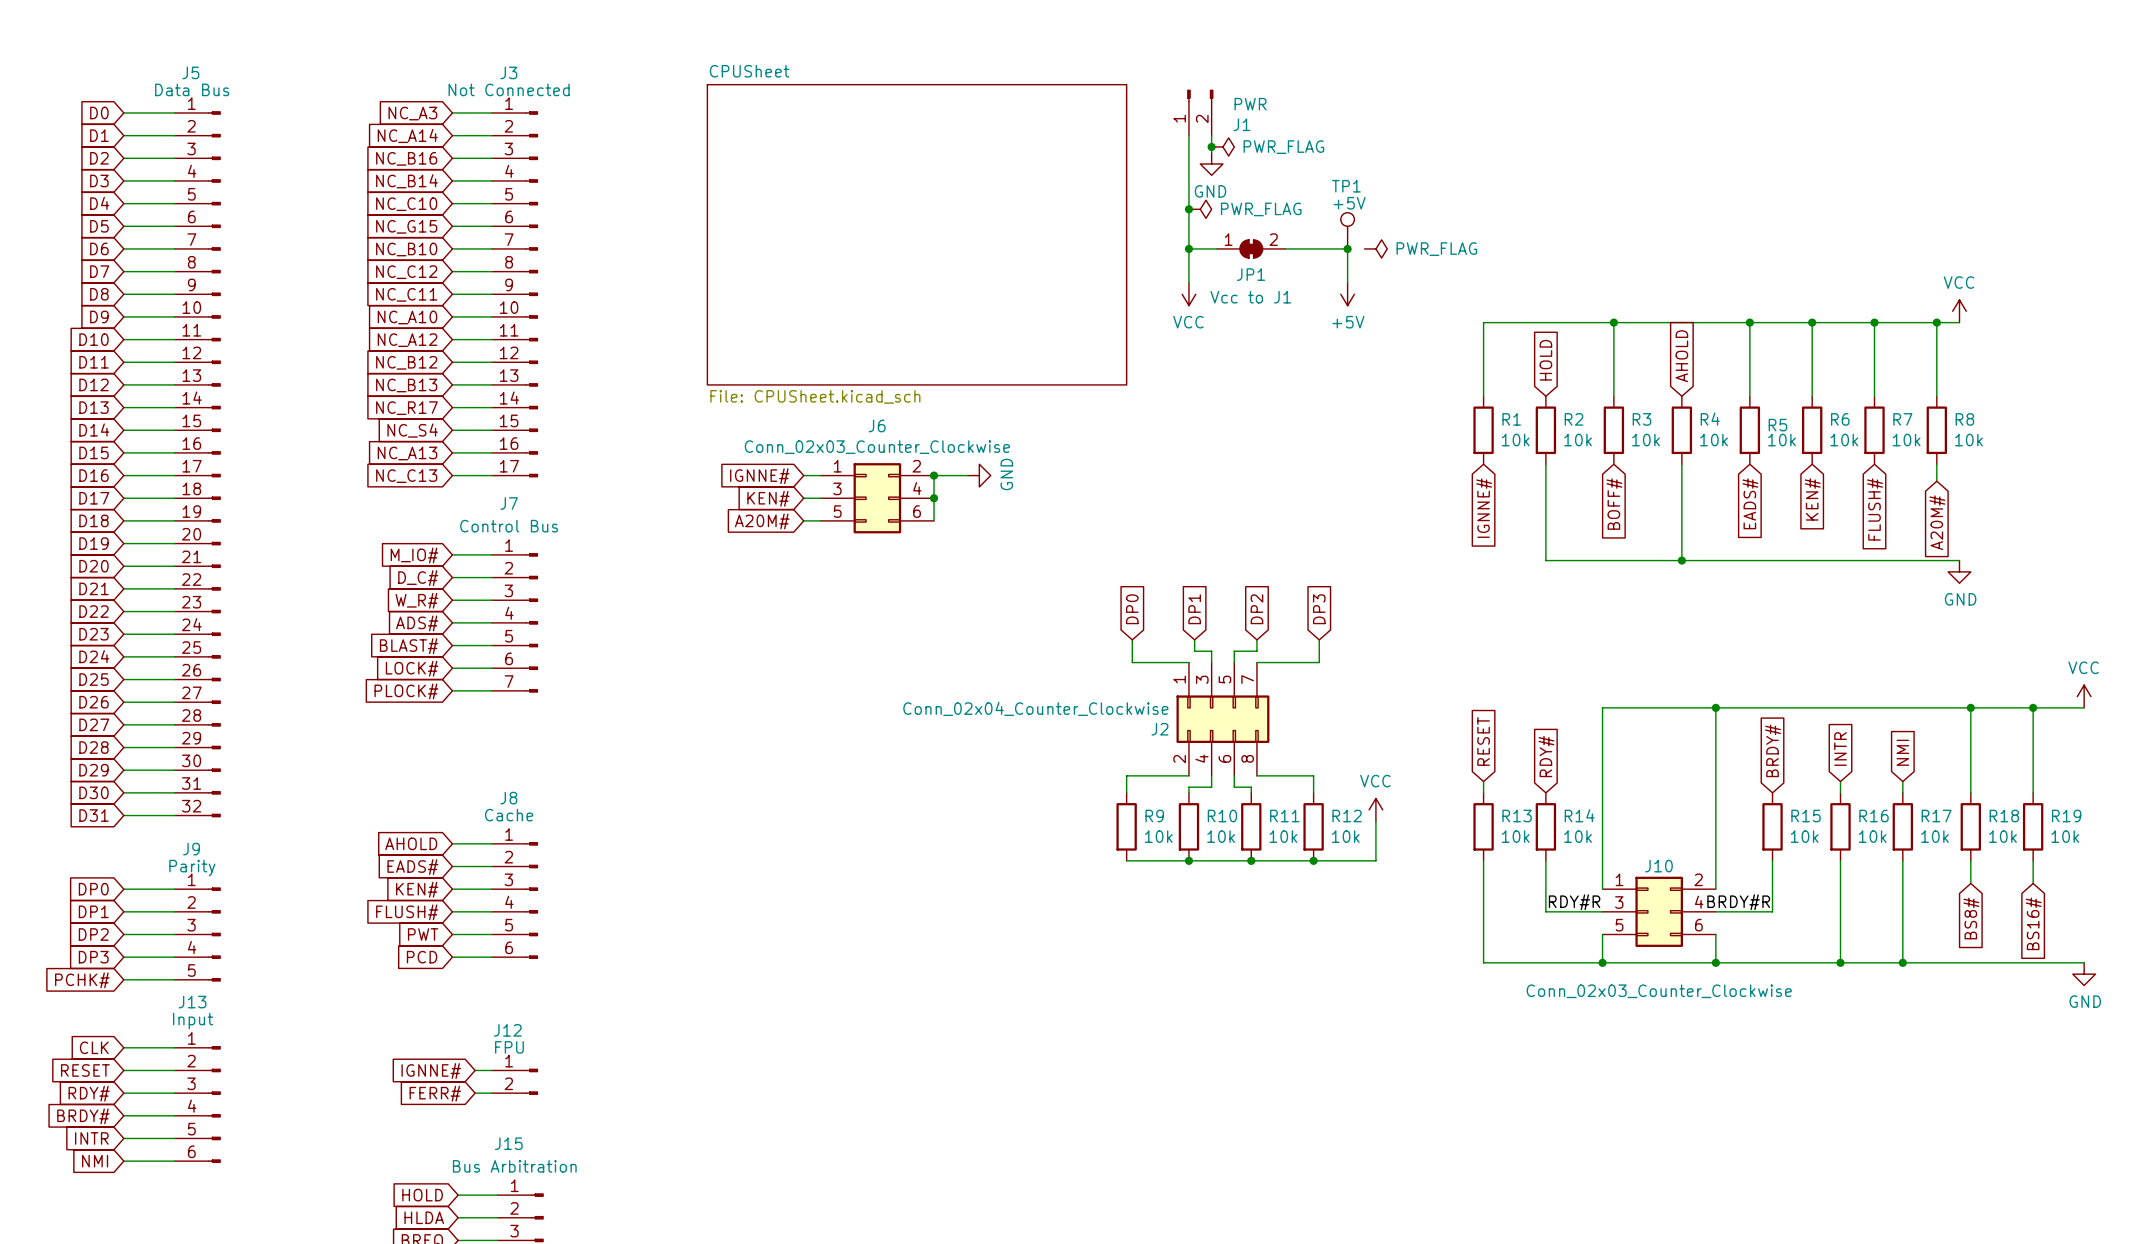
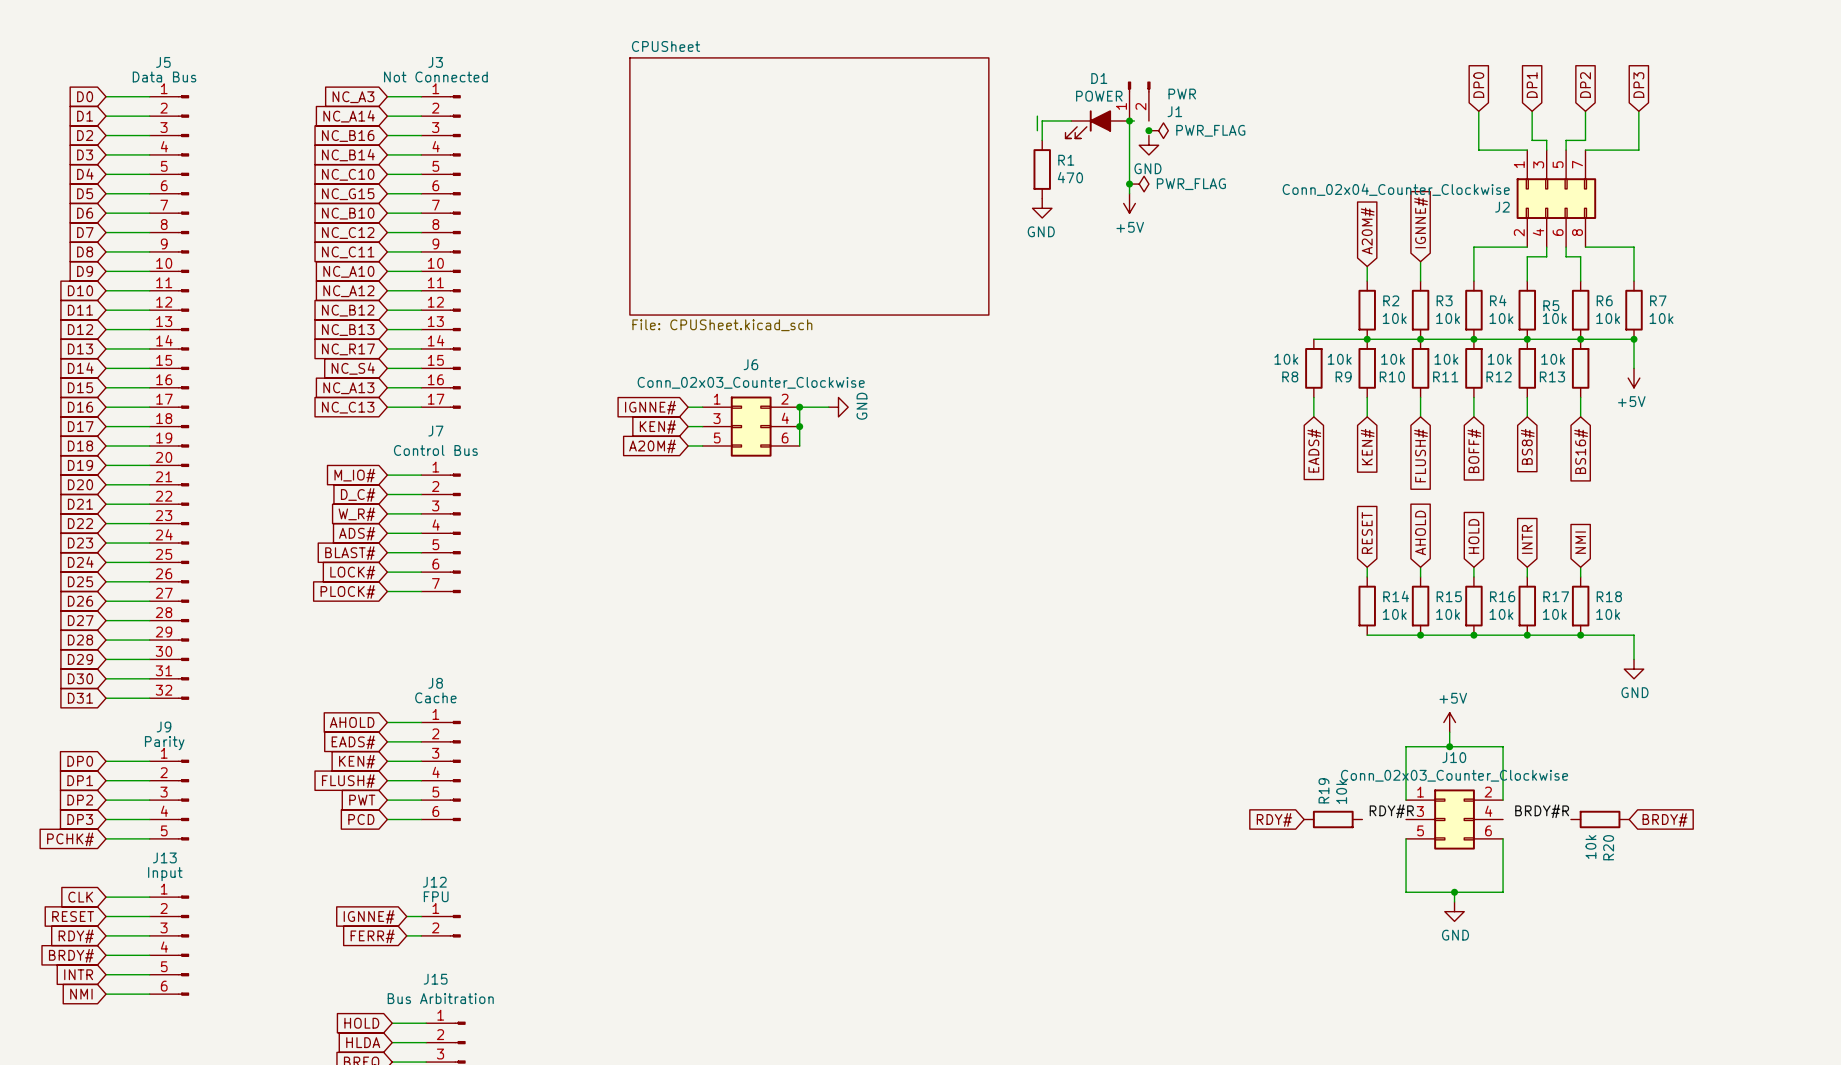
global label: none -> DP0 (1478, 85)
global label: none -> DP1 (1532, 85)
global label: none -> DP2 (1585, 85)
global label: none -> DP3 (1638, 85)
J1 position: (1200, 112) -> (1139, 101)
wire: none -> (1478, 111) (1478, 150) (1527, 150)
wire: none -> (1532, 111) (1532, 140) (1546, 140) (1546, 150)
wire: none -> (1585, 111) (1585, 140) (1566, 140) (1566, 150)
wire: none -> (1638, 111) (1638, 150) (1585, 150)
wire: (1188, 135) (1188, 282) -> none
wire: none -> (1071, 120) (1042, 120) (1042, 140)
junction: none -> (1129, 120)
wire: none -> (1134, 120) (1129, 120) (1129, 193)
D1: none -> POWER (1097, 124)
junction: (1211, 146) -> none
power symbol: PWR_FLAG (1222, 146) -> none
junction: none -> (1148, 130)
power symbol: none -> PWR_FLAG (1158, 130)
power symbol: GND (1211, 163) -> none
power symbol: none -> GND (1148, 145)
junction: (1188, 209) -> none
power symbol: PWR_FLAG (1200, 209) -> none
power symbol: none -> PWR_FLAG (1139, 184)
TP1: +5V (1347, 230) -> none
sheet CPUSheet position: (917, 234) -> (809, 186)
power symbol: none -> GND (1042, 208)
wire: (1188, 248) (1217, 248) -> none
junction: (1188, 248) -> none
JP1: Vcc to J1 (1251, 248) -> none
wire: (1285, 248) (1347, 248) (1347, 282) -> none
junction position: (1347, 248) -> (1129, 184)
power symbol: PWR_FLAG (1375, 248) -> none
global label: none -> IGNNE# (1421, 222)
global label: none -> A20M# (1367, 231)
wire: none -> (1527, 247) (1473, 247) (1473, 281)
wire: none -> (1546, 247) (1546, 256) (1527, 256) (1527, 281)
wire: none -> (1566, 247) (1566, 256) (1580, 256) (1580, 281)
wire: none -> (1585, 247) (1634, 247) (1634, 281)
power symbol: VCC (1188, 294) -> none
power symbol position: +5V (1347, 294) -> +5V (1129, 203)
wire: none -> (1420, 261) (1420, 281)
wire: none -> (1367, 266) (1367, 281)
power symbol: VCC (1959, 311) -> none
wire: (1613, 322) (1613, 396) -> none
junction: (1613, 322) -> none
wire: (1749, 322) (1749, 396) -> none
junction: (1749, 322) -> none
wire: (1812, 322) (1812, 396) -> none
junction: (1812, 322) -> none
wire: (1874, 322) (1874, 396) -> none
junction: (1874, 322) -> none
wire: (1936, 322) (1936, 396) -> none
junction: (1936, 322) -> none
wire: (1959, 322) (1483, 322) (1483, 396) -> none
global label: AHOLD (1681, 356) -> none
global label: HOLD (1545, 360) -> none
wire: none -> (1313, 339) (1634, 339) (1634, 368)
junction: none -> (1367, 339)
junction: none -> (1420, 339)
junction: none -> (1473, 339)
junction: none -> (1527, 339)
junction: none -> (1580, 339)
junction: none -> (1634, 339)
R8 name position: R8 (1964, 419) -> R8 (1290, 376)
R1 position: (1483, 430) -> (1042, 169)
R2 position: (1545, 430) -> (1367, 310)
R3 position: (1613, 430) -> (1420, 310)
R4 position: (1681, 430) -> (1473, 310)
R5 position: (1749, 430) -> (1527, 310)
R6 position: (1812, 430) -> (1580, 310)
R7 position: (1874, 430) -> (1634, 310)
R8 position: (1936, 430) -> (1313, 368)
R1 value: 10k (1515, 440) -> 470 (1070, 177)
R8 value position: 10k (1968, 440) -> 10k (1286, 359)
power symbol: none -> +5V (1634, 378)
wire: none -> (1313, 397) (1313, 416)
wire: (1545, 464) (1545, 560) (1959, 560) -> none
wire: none -> (1367, 397) (1367, 416)
wire: none -> (1420, 397) (1420, 416)
wire: (1681, 464) (1681, 560) -> none
wire: none -> (1473, 397) (1473, 416)
wire: none -> (1527, 397) (1527, 416)
wire: none -> (1580, 397) (1580, 416)
wire: (1936, 464) (1936, 481) -> none
global label position: KEN# (1812, 499) -> KEN# (1367, 447)
global label position: EADS# (1750, 503) -> EADS# (1314, 450)
global label position: BOFF# (1614, 504) -> BOFF# (1474, 450)
global label: IGNNE# (1484, 508) -> none
global label position: FLUSH# (1875, 509) -> FLUSH# (1421, 455)
global label: none -> BS8# (1527, 446)
global label: A20M# (1937, 522) -> none
global label: none -> BS16# (1581, 451)
junction: (1681, 560) -> none
power symbol: GND (1959, 571) -> none
global label: DP0 (1132, 609) -> none
global label: DP1 (1194, 609) -> none
global label: DP2 (1256, 609) -> none
global label: DP3 (1319, 609) -> none
global label: none -> AHOLD (1420, 532)
global label: none -> HOLD (1473, 536)
wire: (1132, 639) (1132, 662) (1188, 662) -> none
wire: (1194, 639) (1194, 651) (1211, 651) (1211, 662) -> none
wire: (1256, 639) (1256, 651) (1234, 651) (1234, 662) -> none
wire: (1319, 639) (1319, 662) (1256, 662) -> none
wire: none -> (1420, 567) (1420, 576)
wire: none -> (1473, 567) (1473, 576)
power symbol: VCC (2084, 696) -> none
wire: (1715, 707) (1715, 889) -> none
junction: (1715, 707) -> none
wire: (1970, 707) (1970, 792) -> none
junction: (1970, 707) -> none
wire: (2033, 707) (2033, 792) -> none
junction: (2033, 707) -> none
wire: (2084, 707) (1602, 707) (1602, 889) -> none
J2 position: (1222, 719) -> (1556, 198)
global label position: RESET (1483, 741) -> RESET (1367, 532)
wire: none -> (1367, 635) (1634, 635) (1634, 659)
junction: none -> (1420, 635)
junction: none -> (1473, 635)
junction: none -> (1527, 635)
junction: none -> (1580, 635)
global label position: INTR (1840, 749) -> INTR (1527, 539)
global label rotation: 0° (1773, 750) -> 90° clockwise (1665, 819)
global label position: BRDY# (1773, 750) -> BRDY# (1665, 819)
global label position: NMI (1902, 752) -> NMI (1580, 542)
global label rotation: 0° (1546, 756) -> 90° counterclockwise (1274, 819)
global label position: RDY# (1546, 756) -> RDY# (1274, 819)
wire: (1188, 775) (1126, 775) (1126, 792) -> none
wire: (1211, 775) (1211, 787) (1188, 787) (1188, 792) -> none
wire: (1234, 775) (1234, 787) (1251, 787) (1251, 792) -> none
wire: (1256, 775) (1313, 775) (1313, 792) -> none
wire: (1483, 781) (1483, 792) -> (1367, 567) (1367, 576)
wire: (1840, 781) (1840, 792) -> (1527, 567) (1527, 576)
wire: (1902, 781) (1902, 792) -> (1580, 567) (1580, 576)
power symbol: none -> GND (1634, 669)
power symbol: VCC (1375, 809) -> none
R9 name position: R9 (1154, 816) -> R9 (1343, 376)
R10 name position: R10 (1222, 816) -> R10 (1392, 376)
R11 name position: R11 (1284, 816) -> R11 (1445, 376)
R12 name position: R12 (1347, 816) -> R12 (1499, 376)
R13 name position: R13 (1517, 816) -> R13 (1552, 376)
R19 name position: R19 (2066, 816) -> R19 (1323, 790)
wire: (1375, 821) (1375, 860) (1126, 860) -> none
R9 position: (1126, 826) -> (1367, 368)
R10 position: (1188, 826) -> (1420, 368)
R11 position: (1251, 826) -> (1473, 368)
R12 position: (1313, 826) -> (1527, 368)
R13 position: (1483, 826) -> (1580, 368)
R14 position: (1545, 826) -> (1367, 606)
R15 position: (1772, 826) -> (1420, 606)
R16 position: (1840, 826) -> (1473, 606)
R17 position: (1902, 826) -> (1527, 606)
R18 position: (1970, 826) -> (1580, 606)
R19 rotation: 0° (2033, 826) -> 90° clockwise (1333, 819)
R19 position: (2033, 826) -> (1333, 819)
R9 value position: 10k (1158, 836) -> 10k (1339, 359)
R10 value position: 10k (1221, 836) -> 10k (1393, 359)
R11 value position: 10k (1283, 836) -> 10k (1446, 359)
R12 value position: 10k (1345, 836) -> 10k (1499, 359)
R13 value position: 10k (1515, 836) -> 10k (1553, 359)
R19 value position: 10k (2065, 836) -> 10k (1341, 791)
power symbol: none -> +5V (1449, 722)
wire: none -> (1449, 732) (1449, 746)
junction: (1188, 860) -> none
junction: (1251, 860) -> none
junction: (1313, 860) -> none
wire: (1483, 860) (1483, 962) (2084, 962) -> none
wire: (1545, 860) (1545, 911) (1602, 911) -> none
wire: (1772, 860) (1772, 911) (1715, 911) -> none
wire: (1840, 860) (1840, 962) -> none
wire: (1902, 860) (1902, 962) -> none
wire: (1970, 860) (1970, 883) -> none
wire: (2033, 860) (2033, 883) -> none
J10 name position: J10 (1658, 866) -> J10 (1454, 757)
junction: none -> (1449, 746)
label position: RDY#R (1574, 902) -> RDY#R (1391, 811)
label position: BRDY#R (1738, 902) -> BRDY#R (1542, 811)
J10 position: (1659, 911) -> (1454, 819)
global label: BS8# (1971, 918) -> none
global label: BS16# (2033, 923) -> none
wire: (1602, 934) (1602, 962) -> none
wire: none -> (1406, 800) (1406, 746) (1503, 746) (1503, 800)
R20: none -> 10k (1600, 819)
junction: (1602, 962) -> none
junction: (1715, 962) -> none
junction: (1840, 962) -> none
junction: (1902, 962) -> none
power symbol: GND (2084, 974) -> none
wire: none -> (1406, 838) (1406, 892) (1503, 892) (1503, 838)
J10 value position: Conn_02x03_Counter_Clockwise (1659, 991) -> Conn_02x03_Counter_Clockwise (1454, 775)
wire: none -> (1454, 892) (1454, 901)
junction: none -> (1454, 892)
power symbol: none -> GND (1454, 911)

